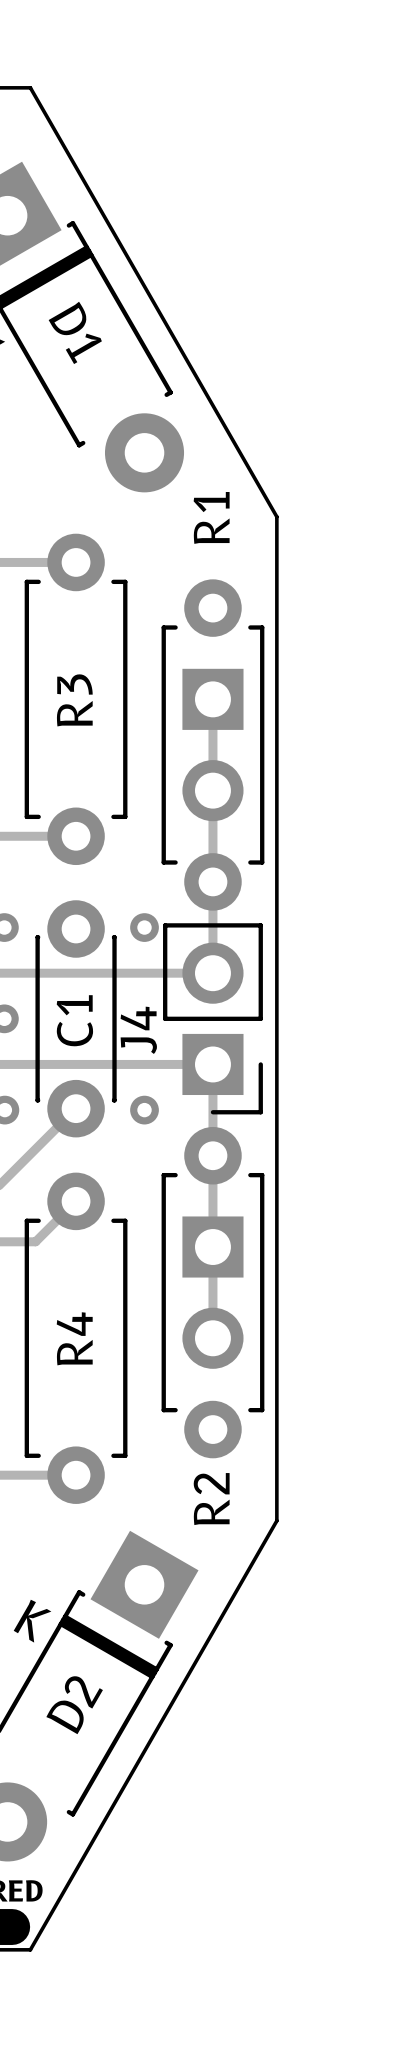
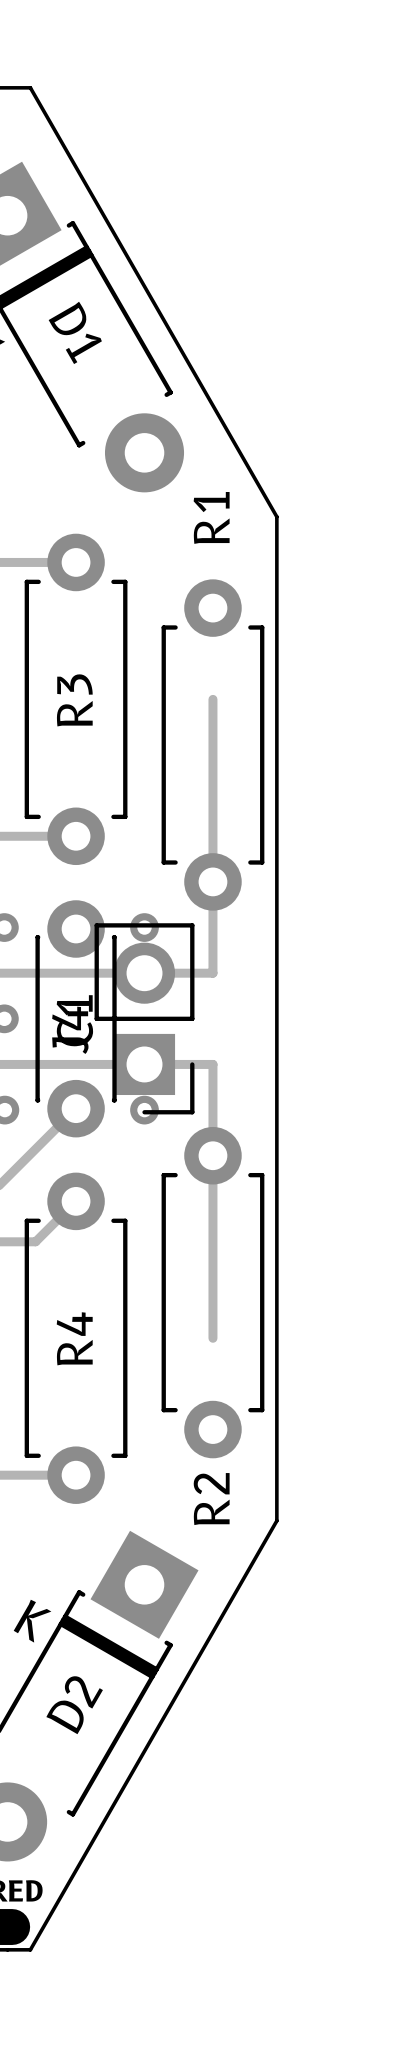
part: (212, 745) -> none
J4 position: (212, 1018) -> (144, 1018)
part: (212, 1292) -> none

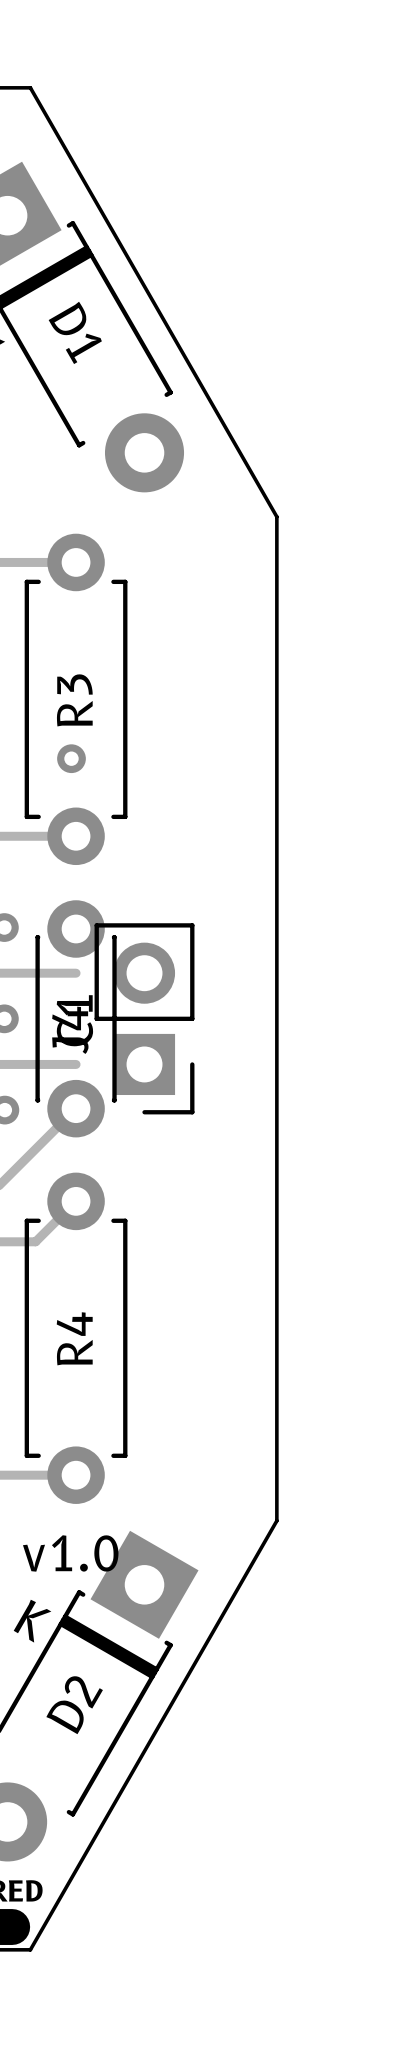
track: (212, 699) (212, 973) (76, 973) -> none
R1: (212, 745) -> none
via: none -> (71, 758)
via: (144, 927) -> none
track: (76, 1064) (212, 1064) (212, 1338) -> none
via: (144, 1110) -> none
R2: (212, 1292) -> none
text: none -> v1.0 (70, 1553)

